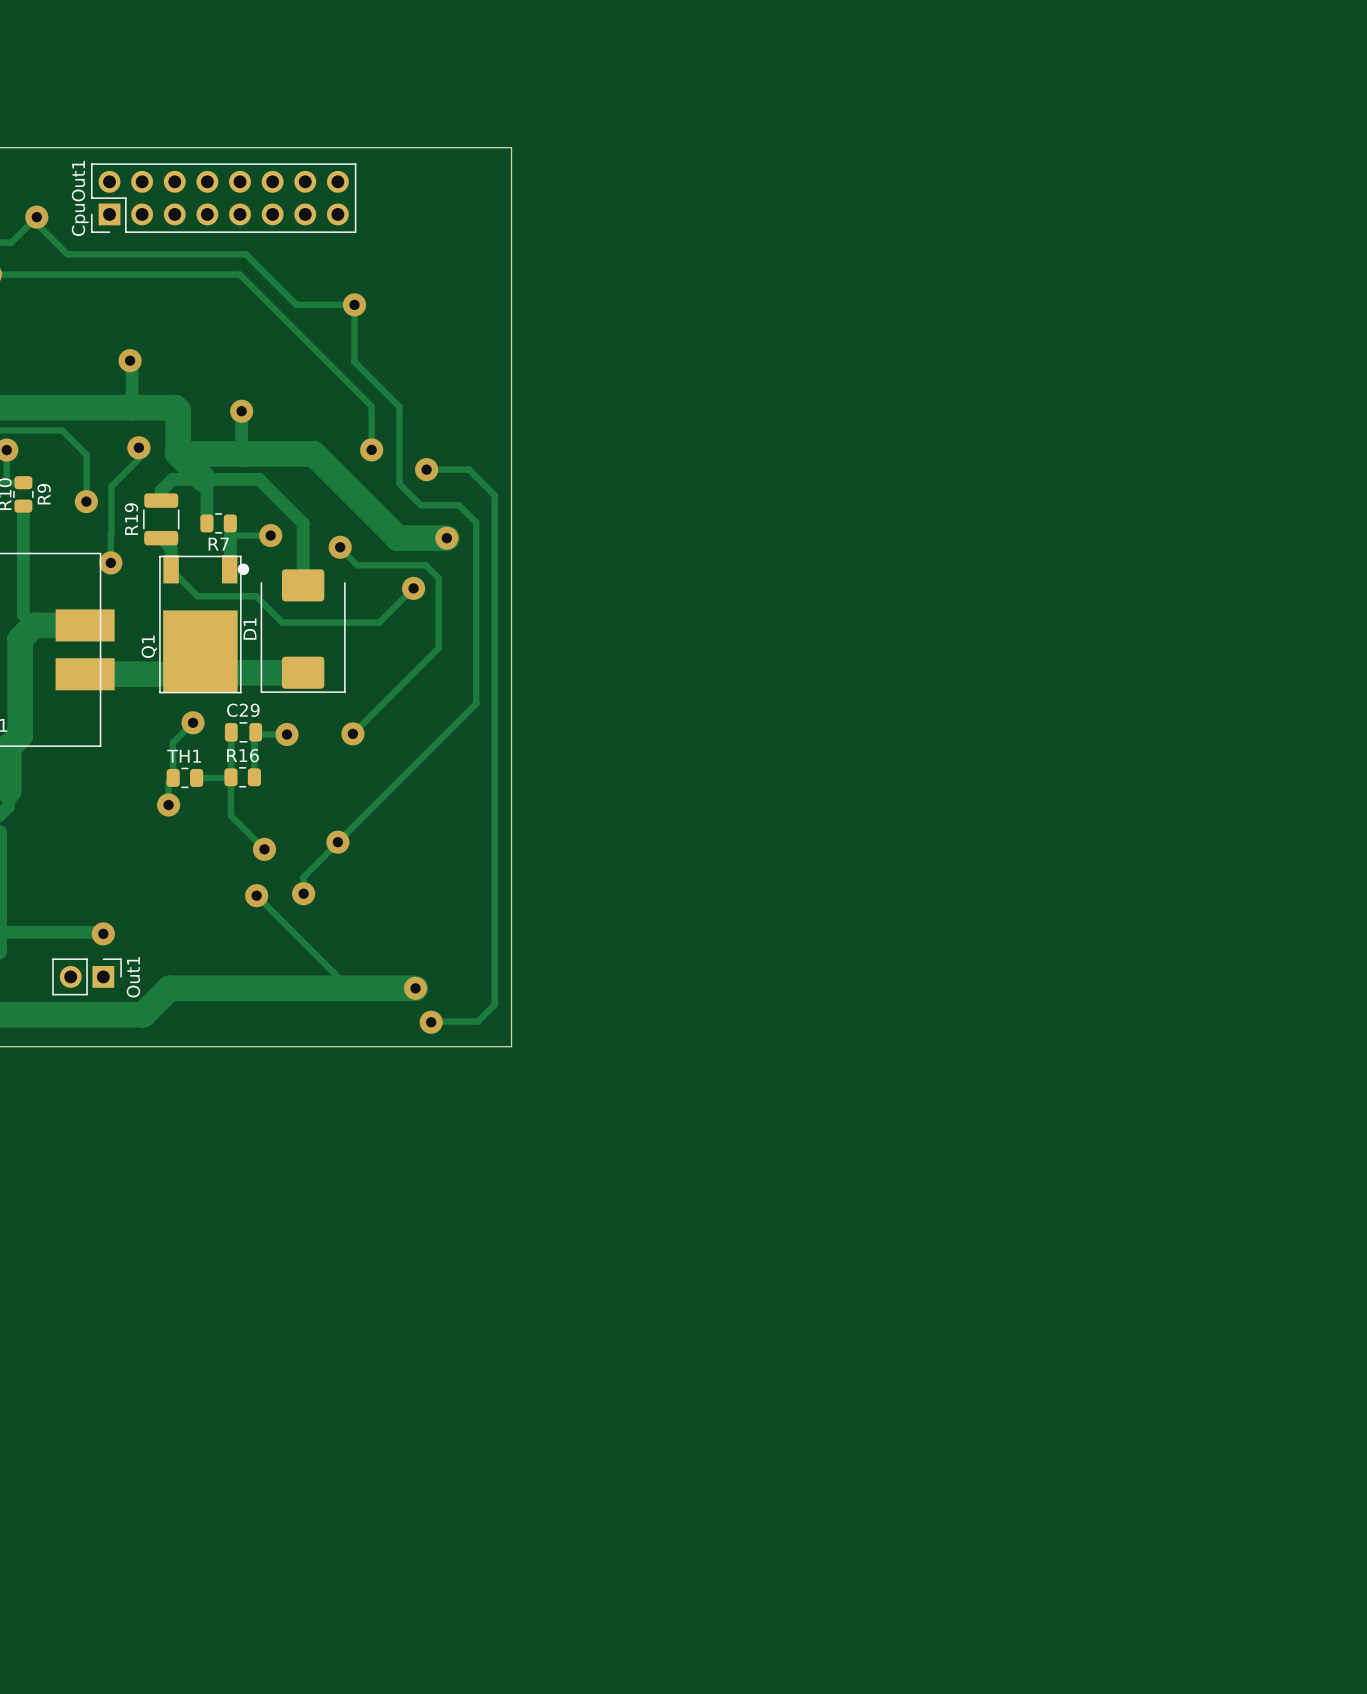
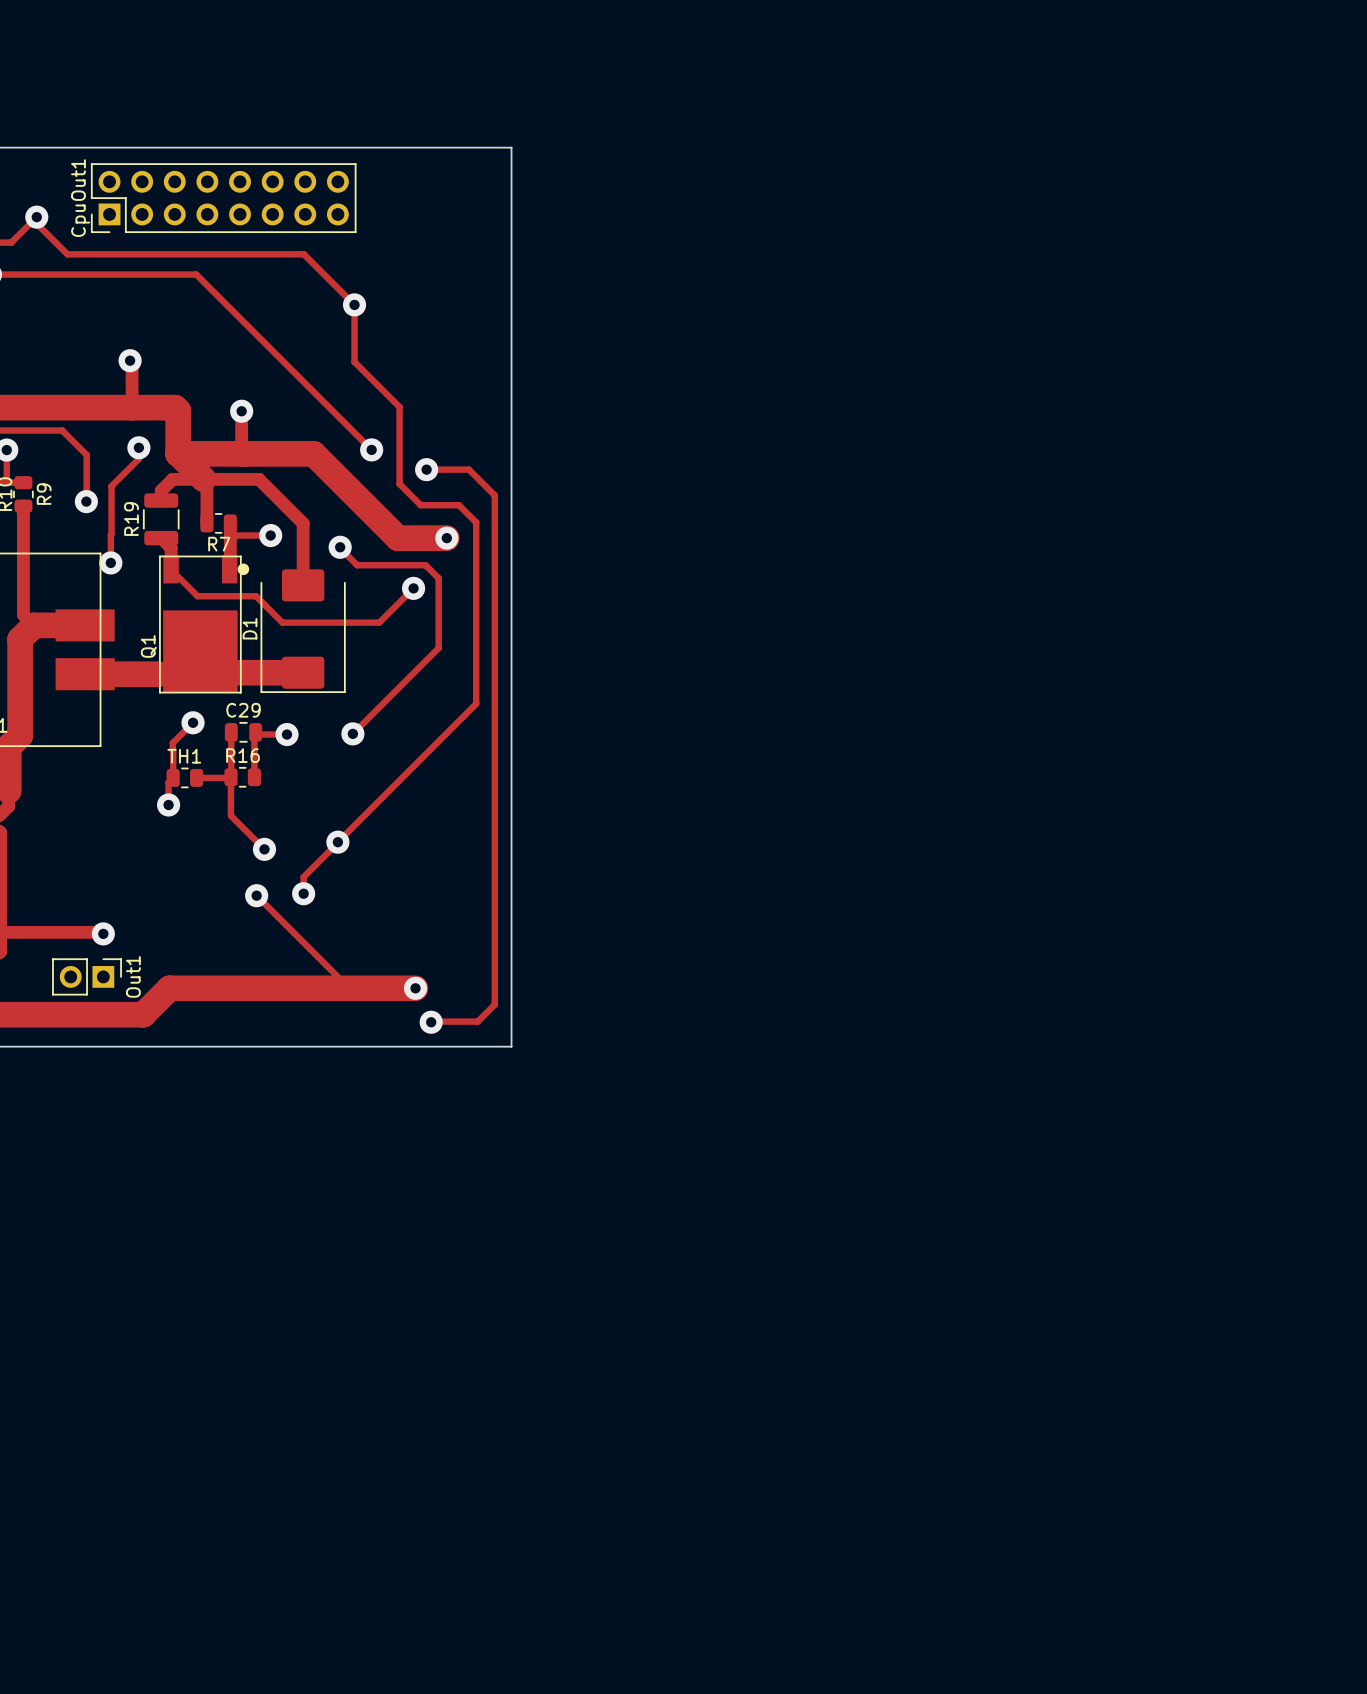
track: (245, 254) (296, 304) (354, 304) -> (245, 254) (303, 254) (354, 304)
track: (196, 274) (239, 274) (371, 406) (371, 449) -> (196, 274) (371, 449)

